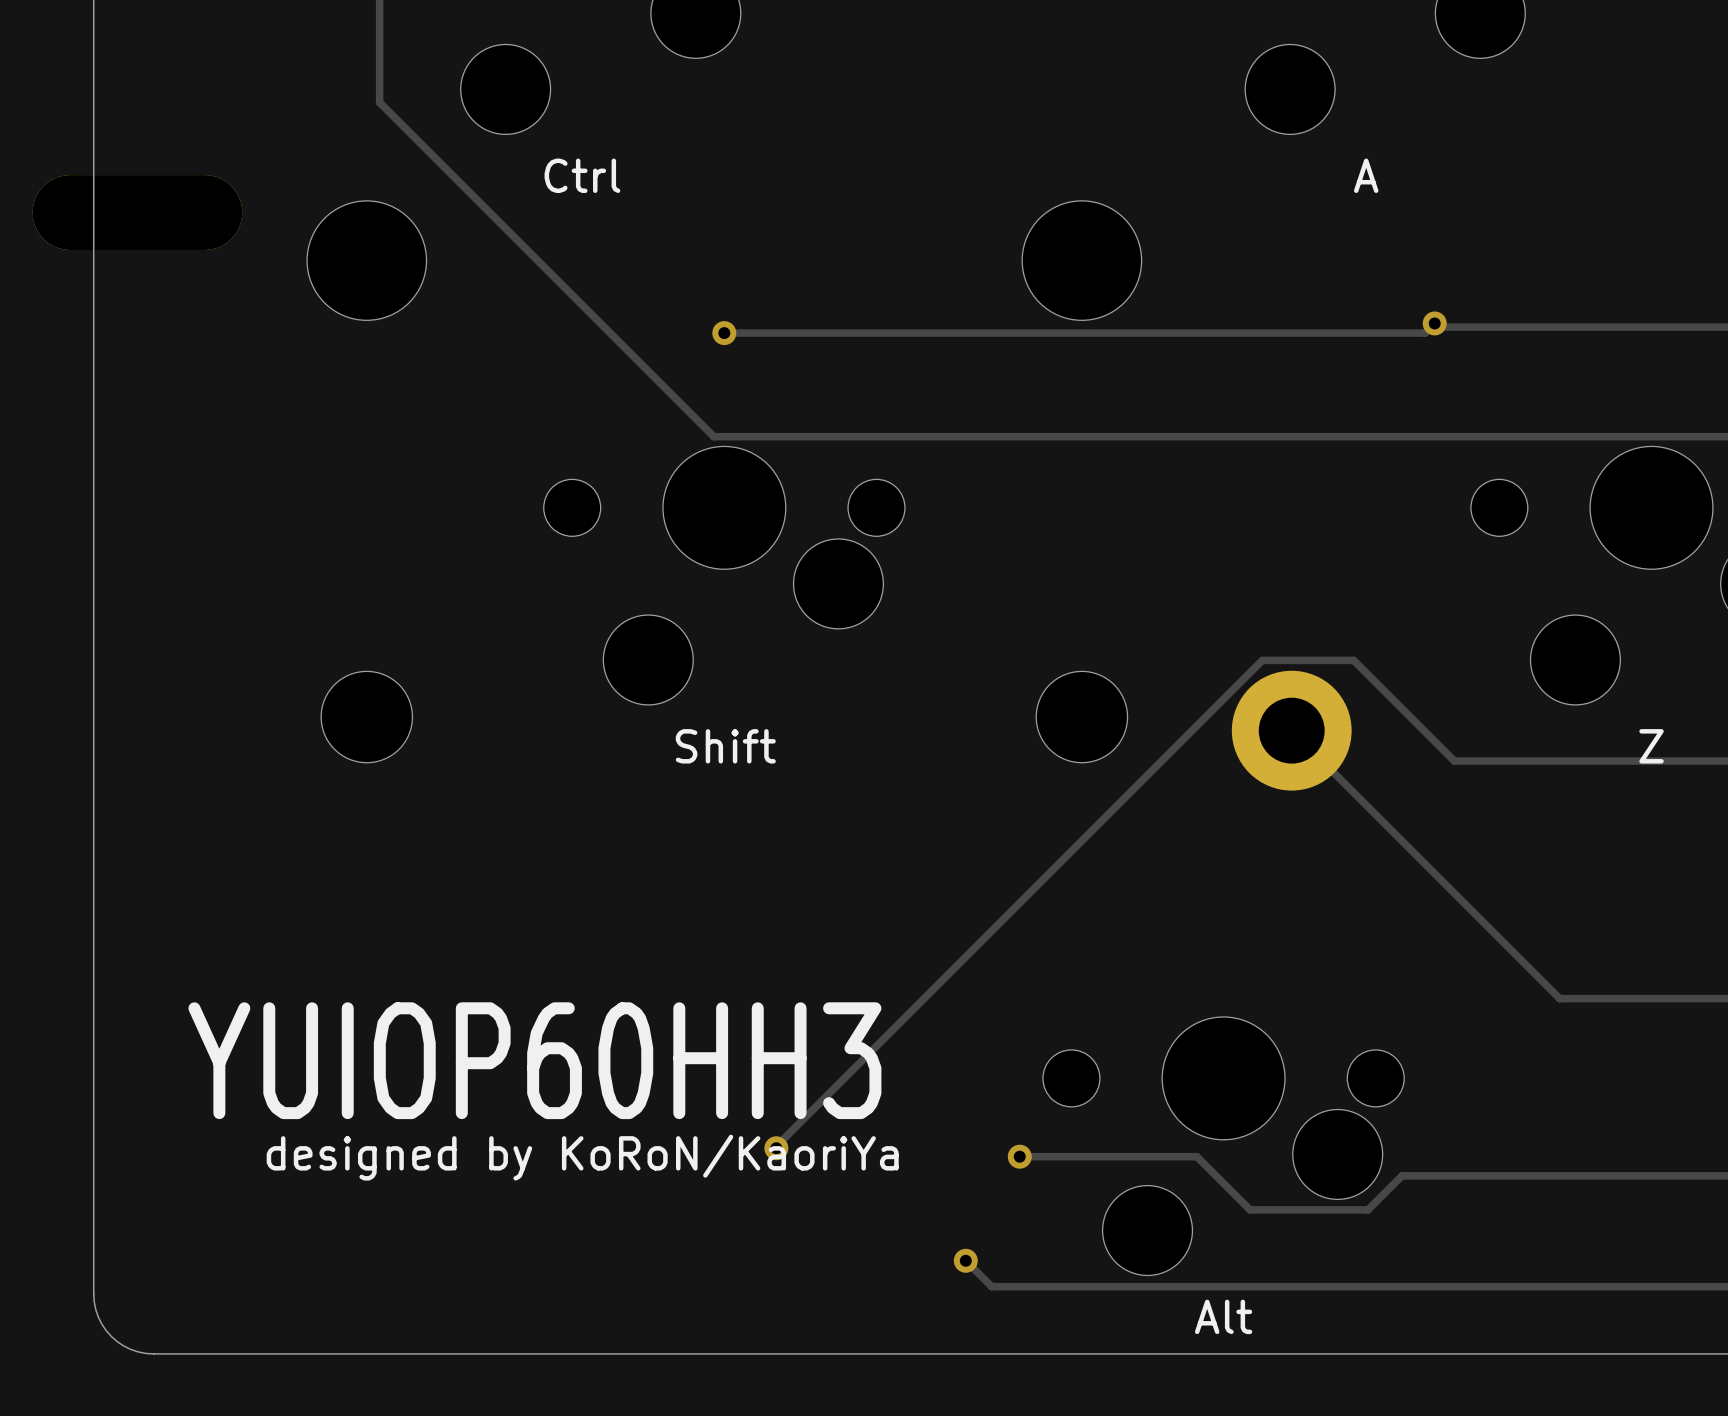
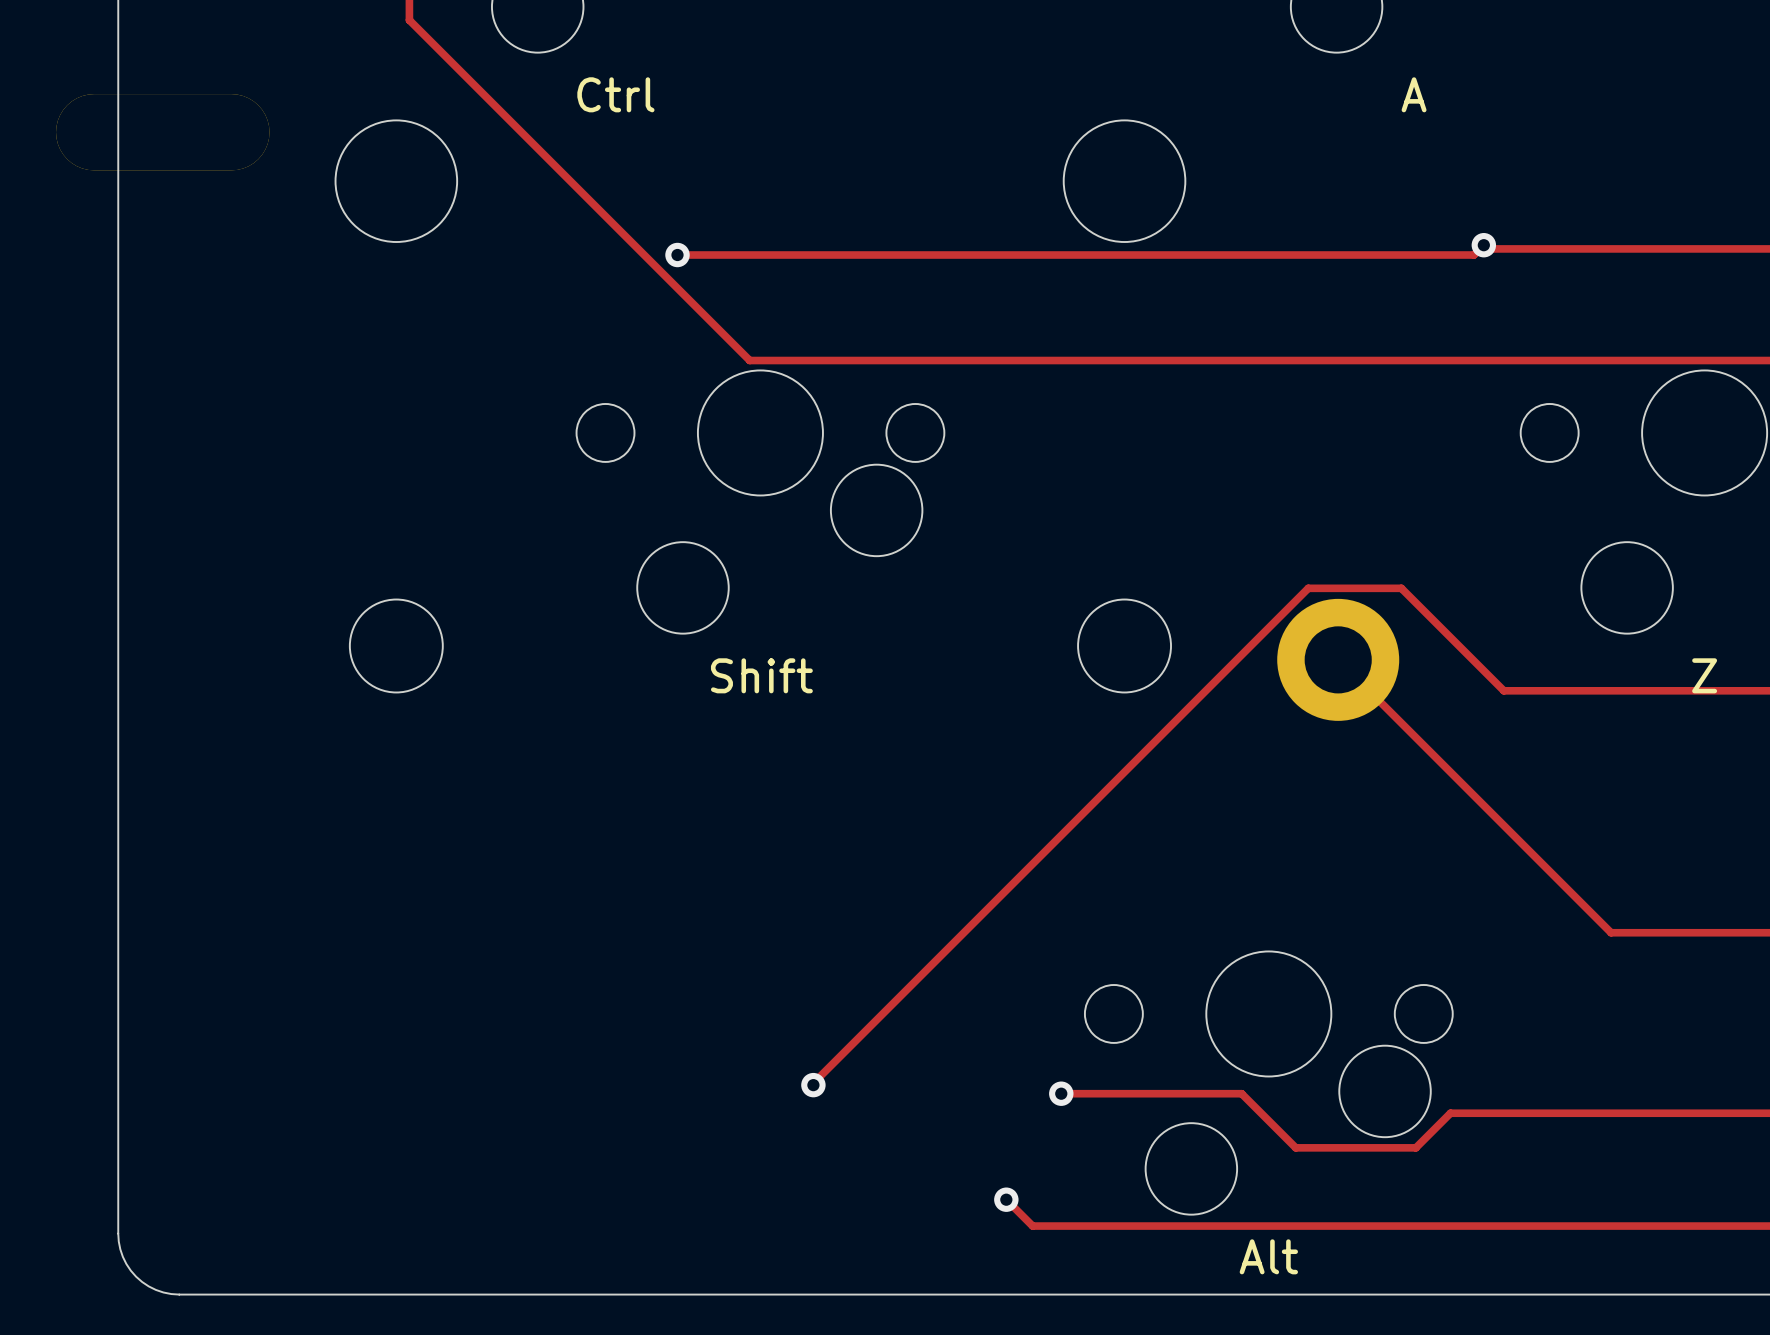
track: none -> (677, 255) (760, 255)
via position: (724, 333) -> (677, 255)
text: YUIOP60HH3 (534, 1060) -> none
text: designed by KoRoN/KaoriYa (582, 1157) -> none

